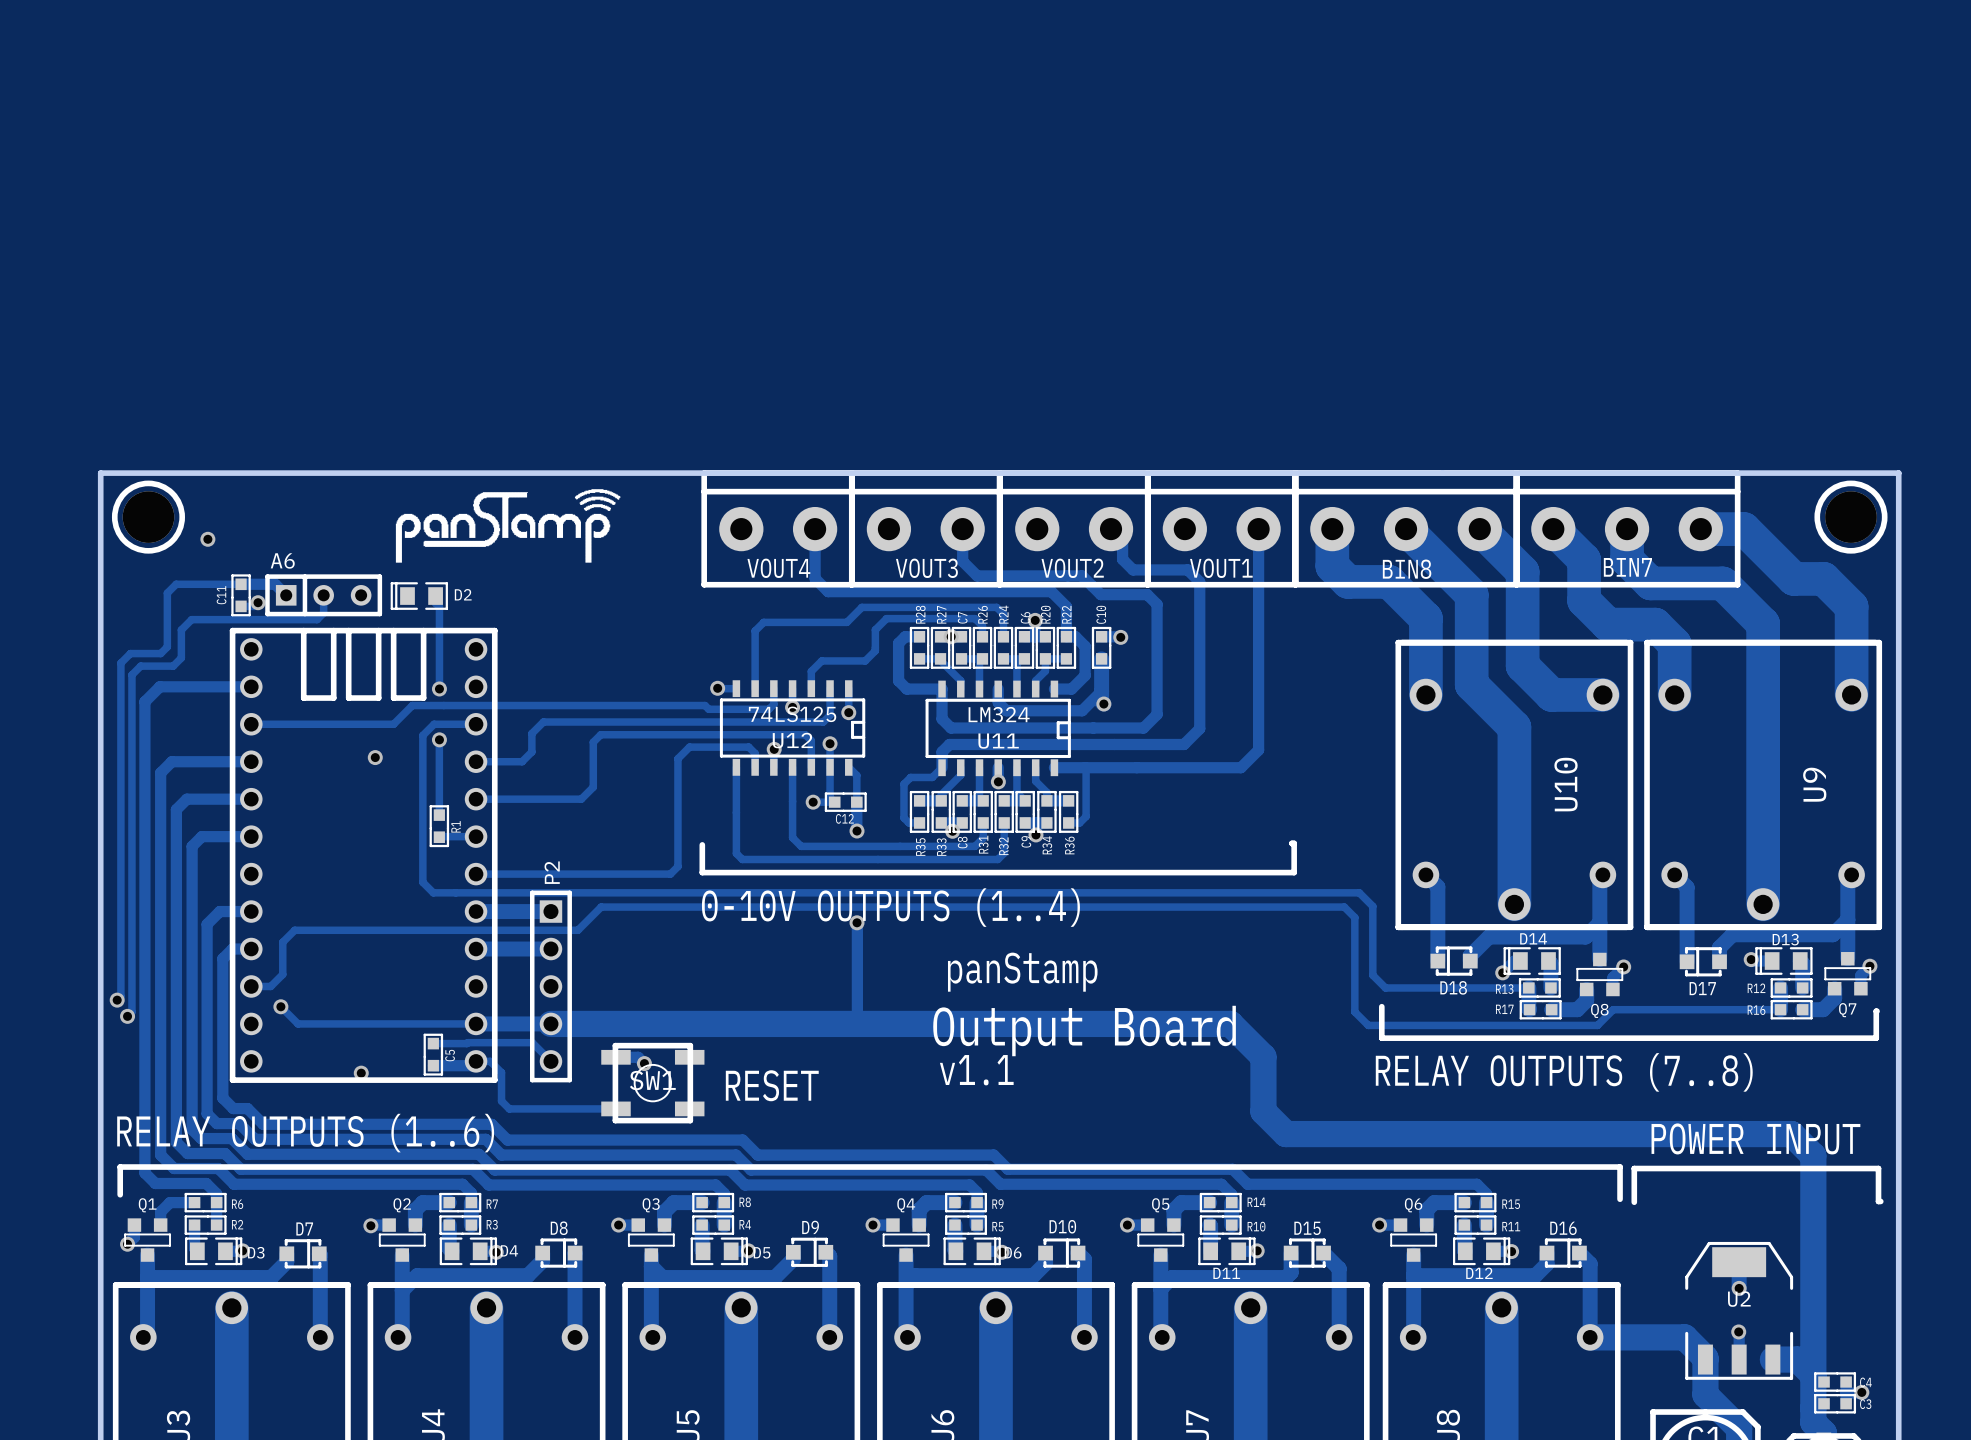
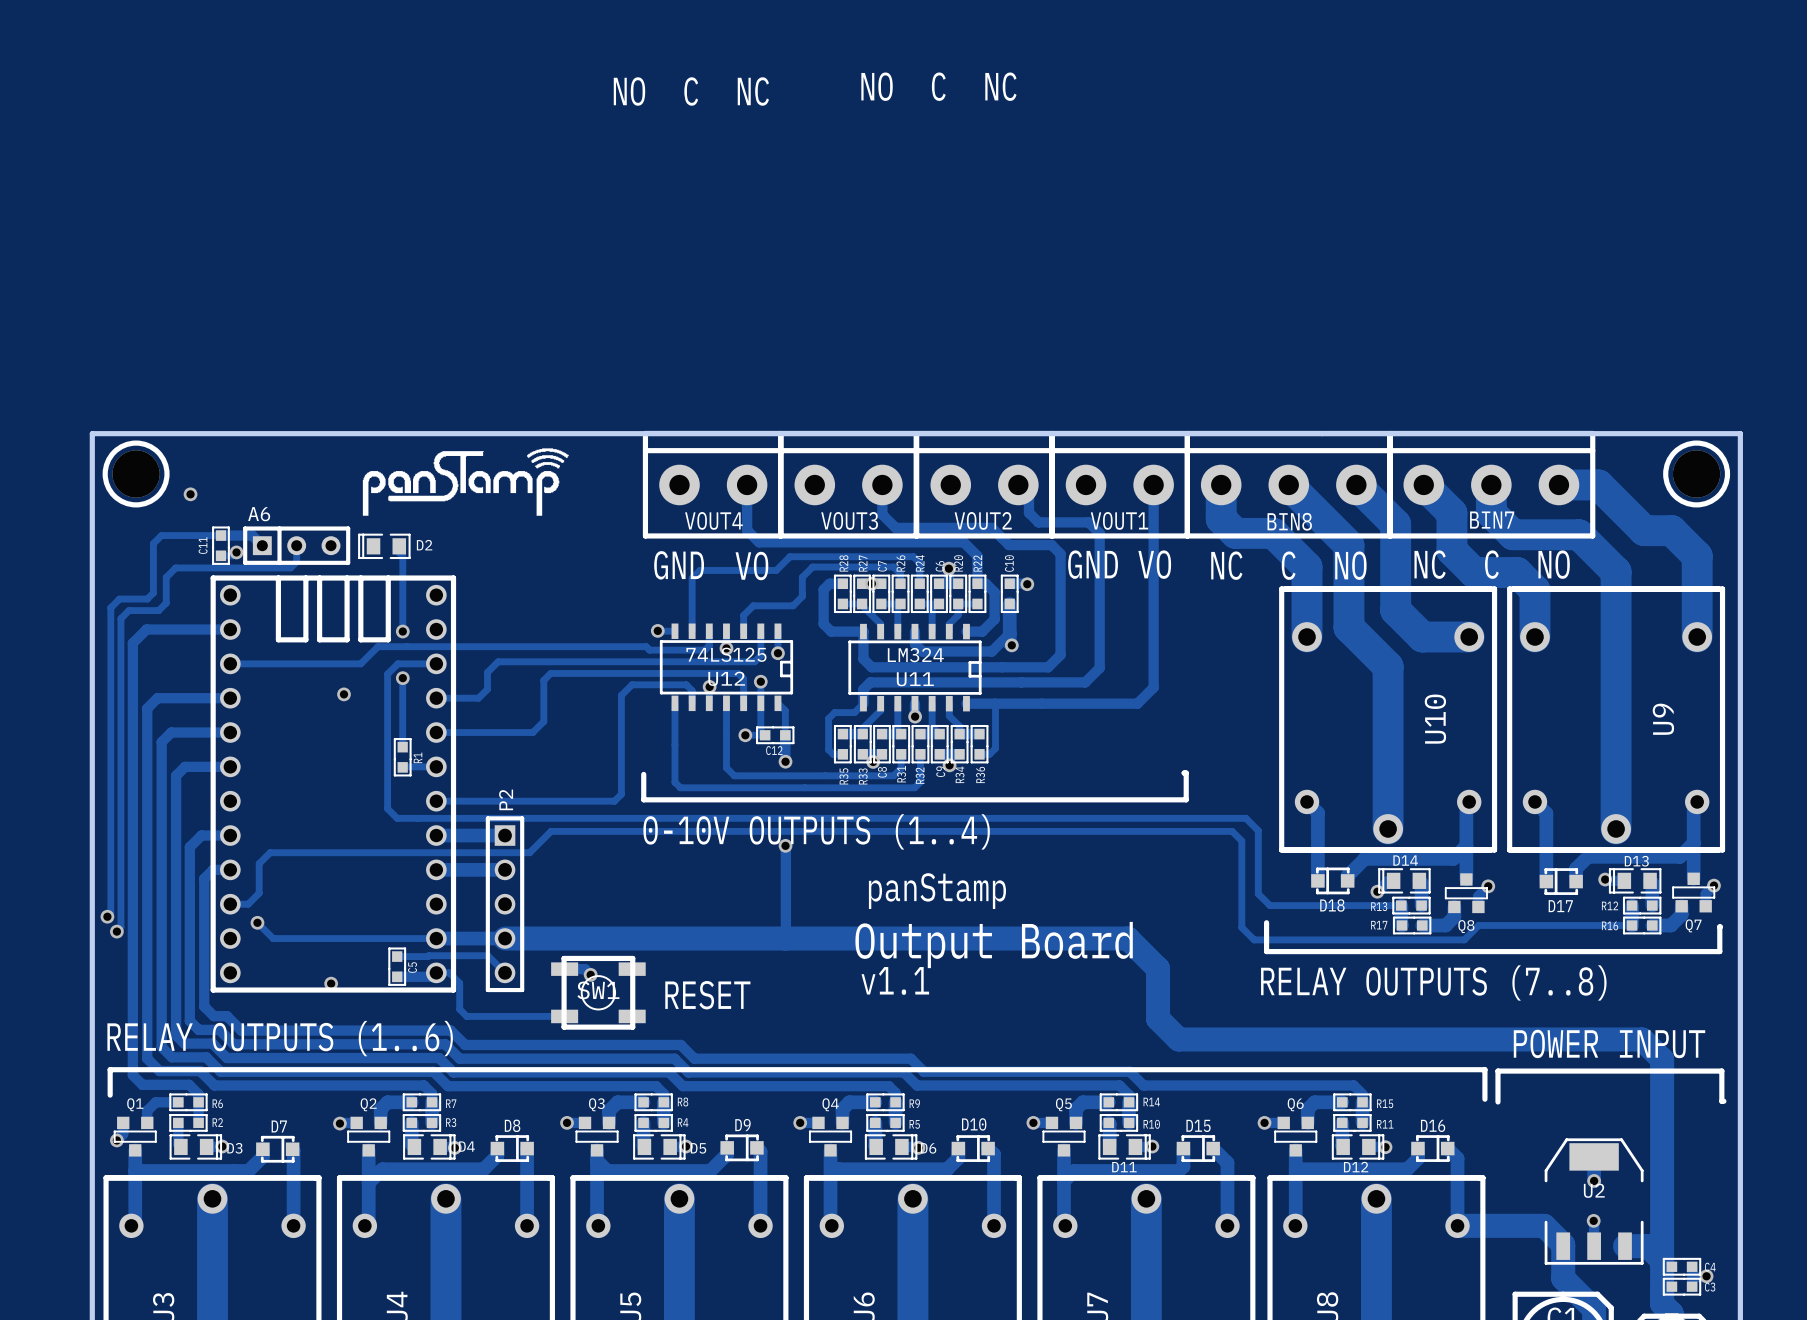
text: none -> NO C NC (938, 86)
text: none -> NO C NC (691, 91)
text: none -> GND (679, 565)
text: none -> GND VO (1119, 564)
text: none -> NC C NO (1492, 564)
text: none -> VO (751, 566)
text: none -> NC C NO (1288, 565)

